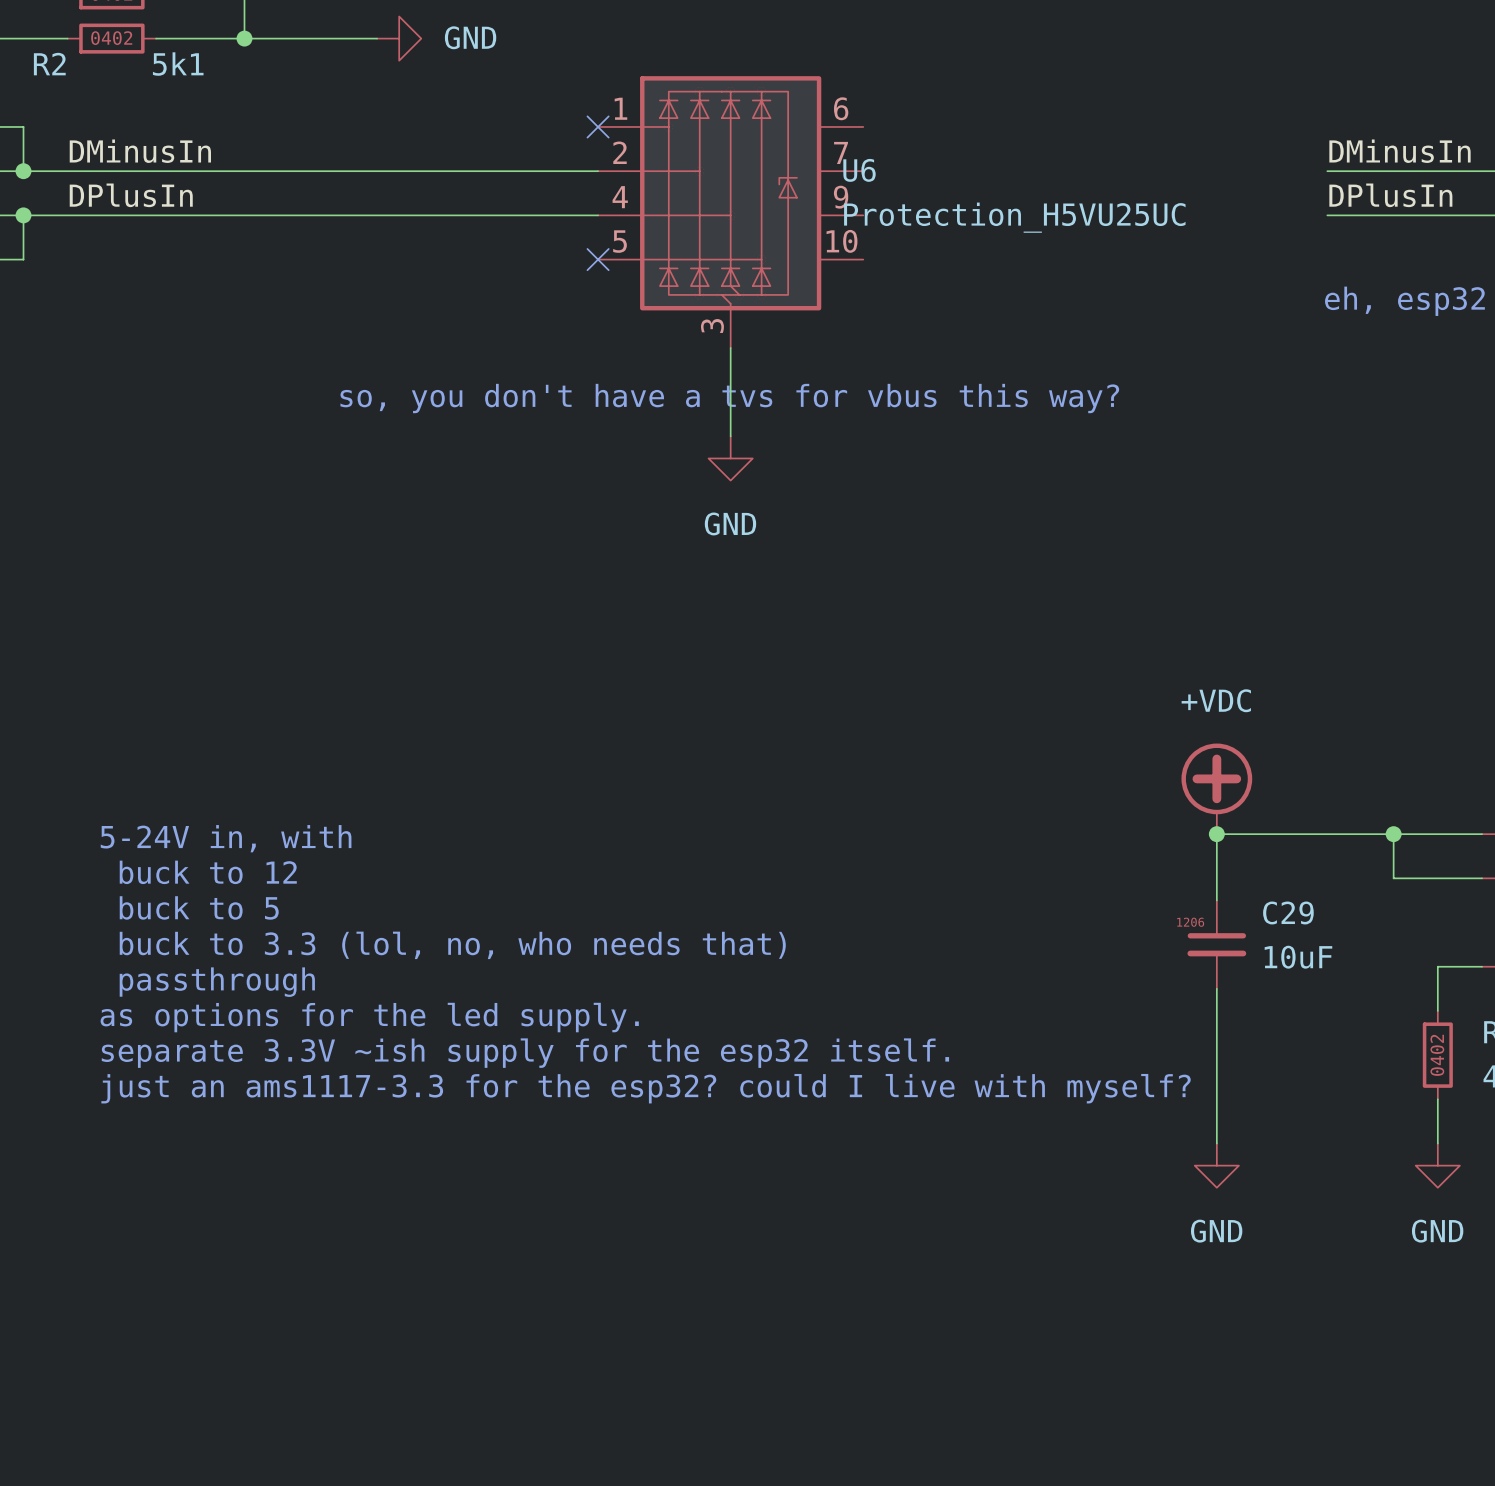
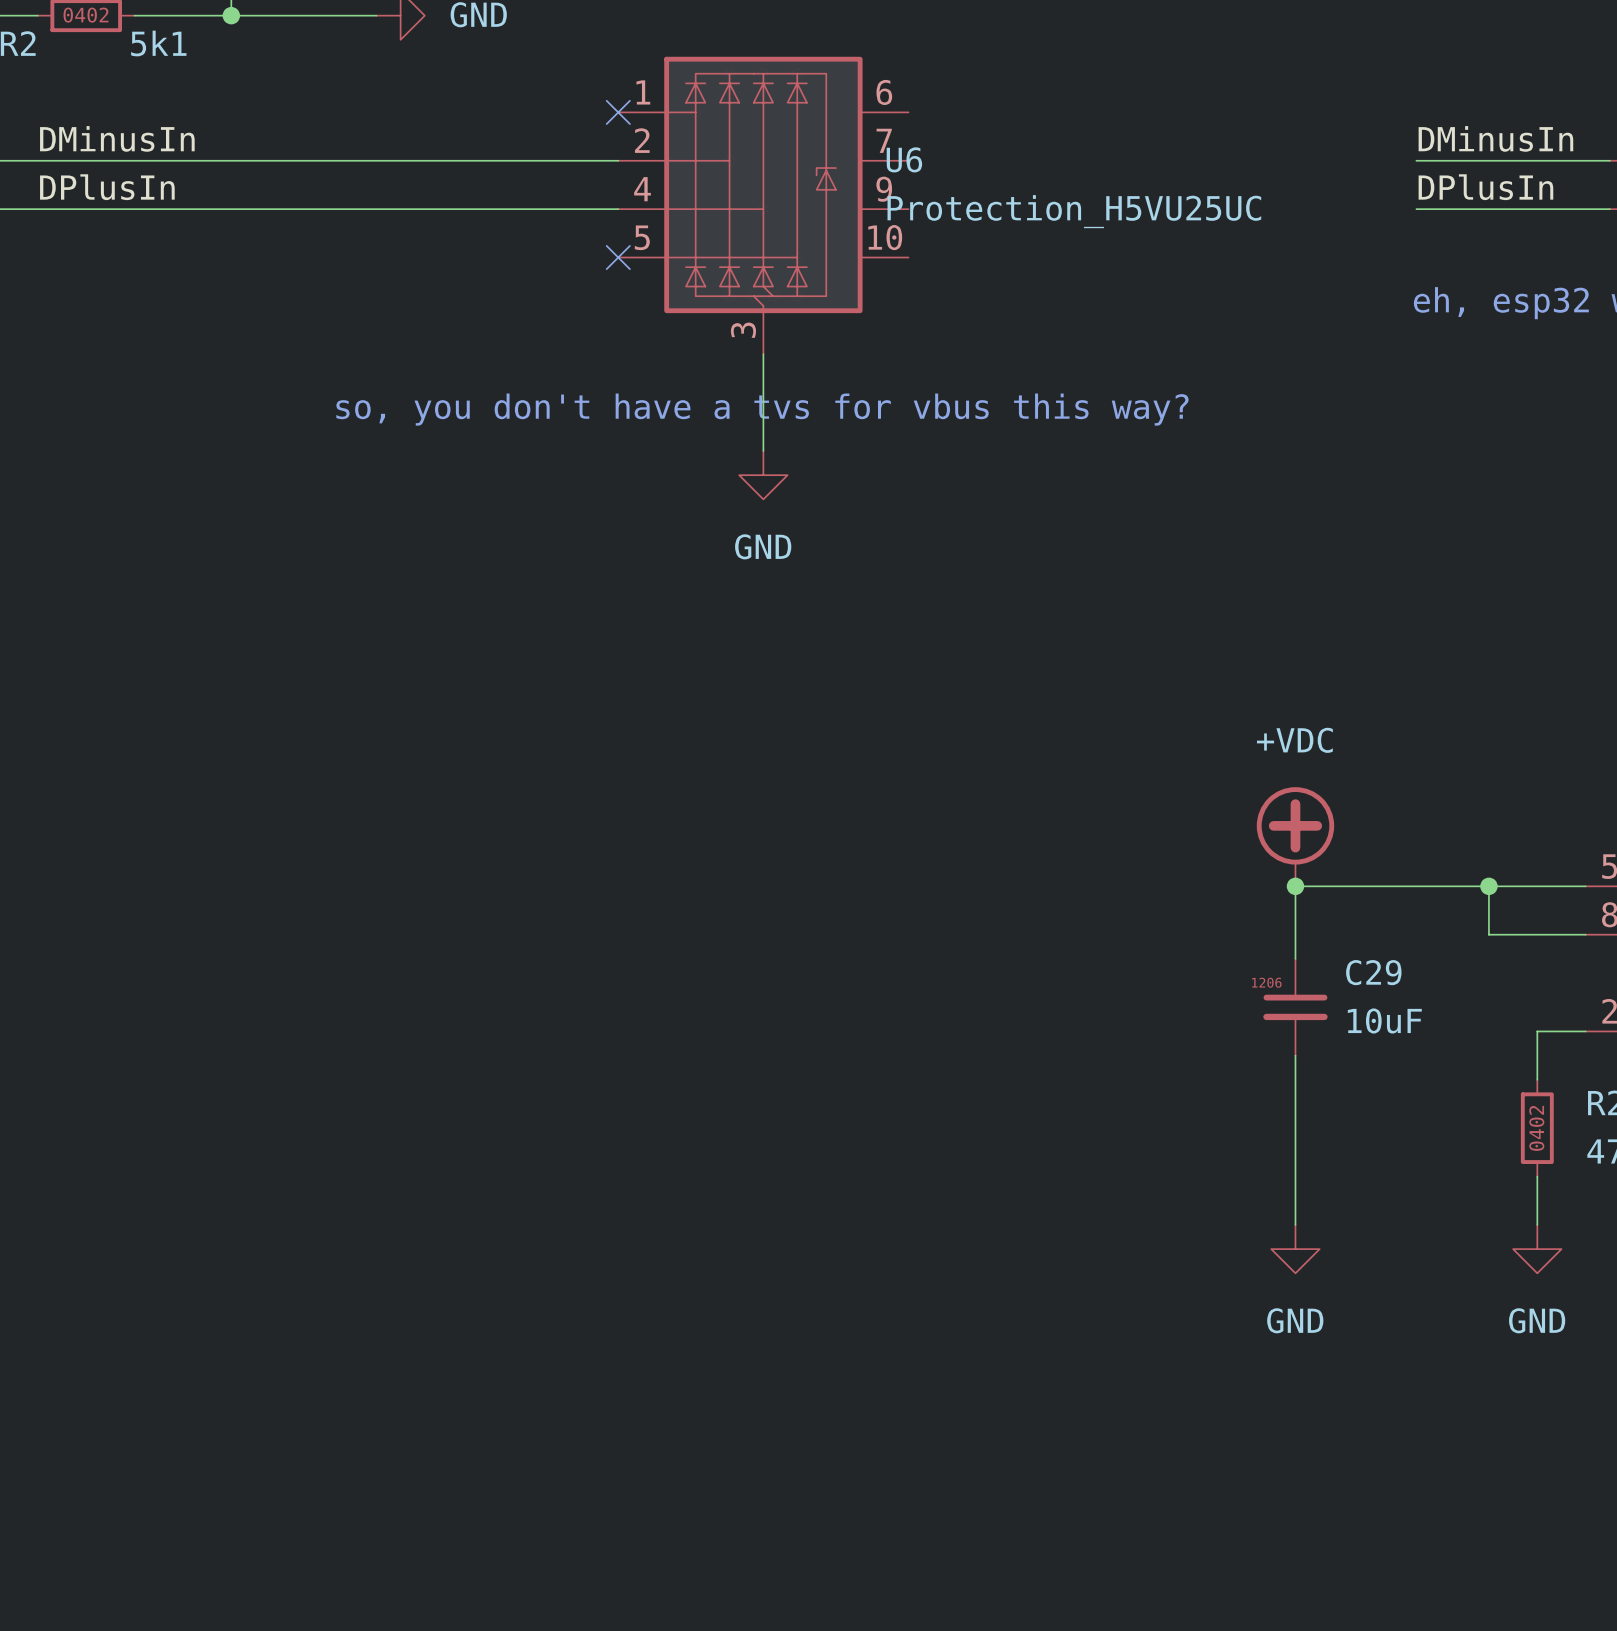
text: 5-24V in, with (226, 838) -> none
text: buck to 12 (208, 872) -> none
text: buck to 5 (199, 907) -> none
text: buck to 3.3 (lol, no, who needs that) (452, 945) -> none
text: passthrough (217, 982) -> none
text: as options for the led supply. (369, 1017) -> none
text: separate 3.3V ~ish supply for the esp32 itself. (525, 1053) -> none
text: just an ams1117-3.3 for the esp32? could I live with myself? (646, 1088) -> none

